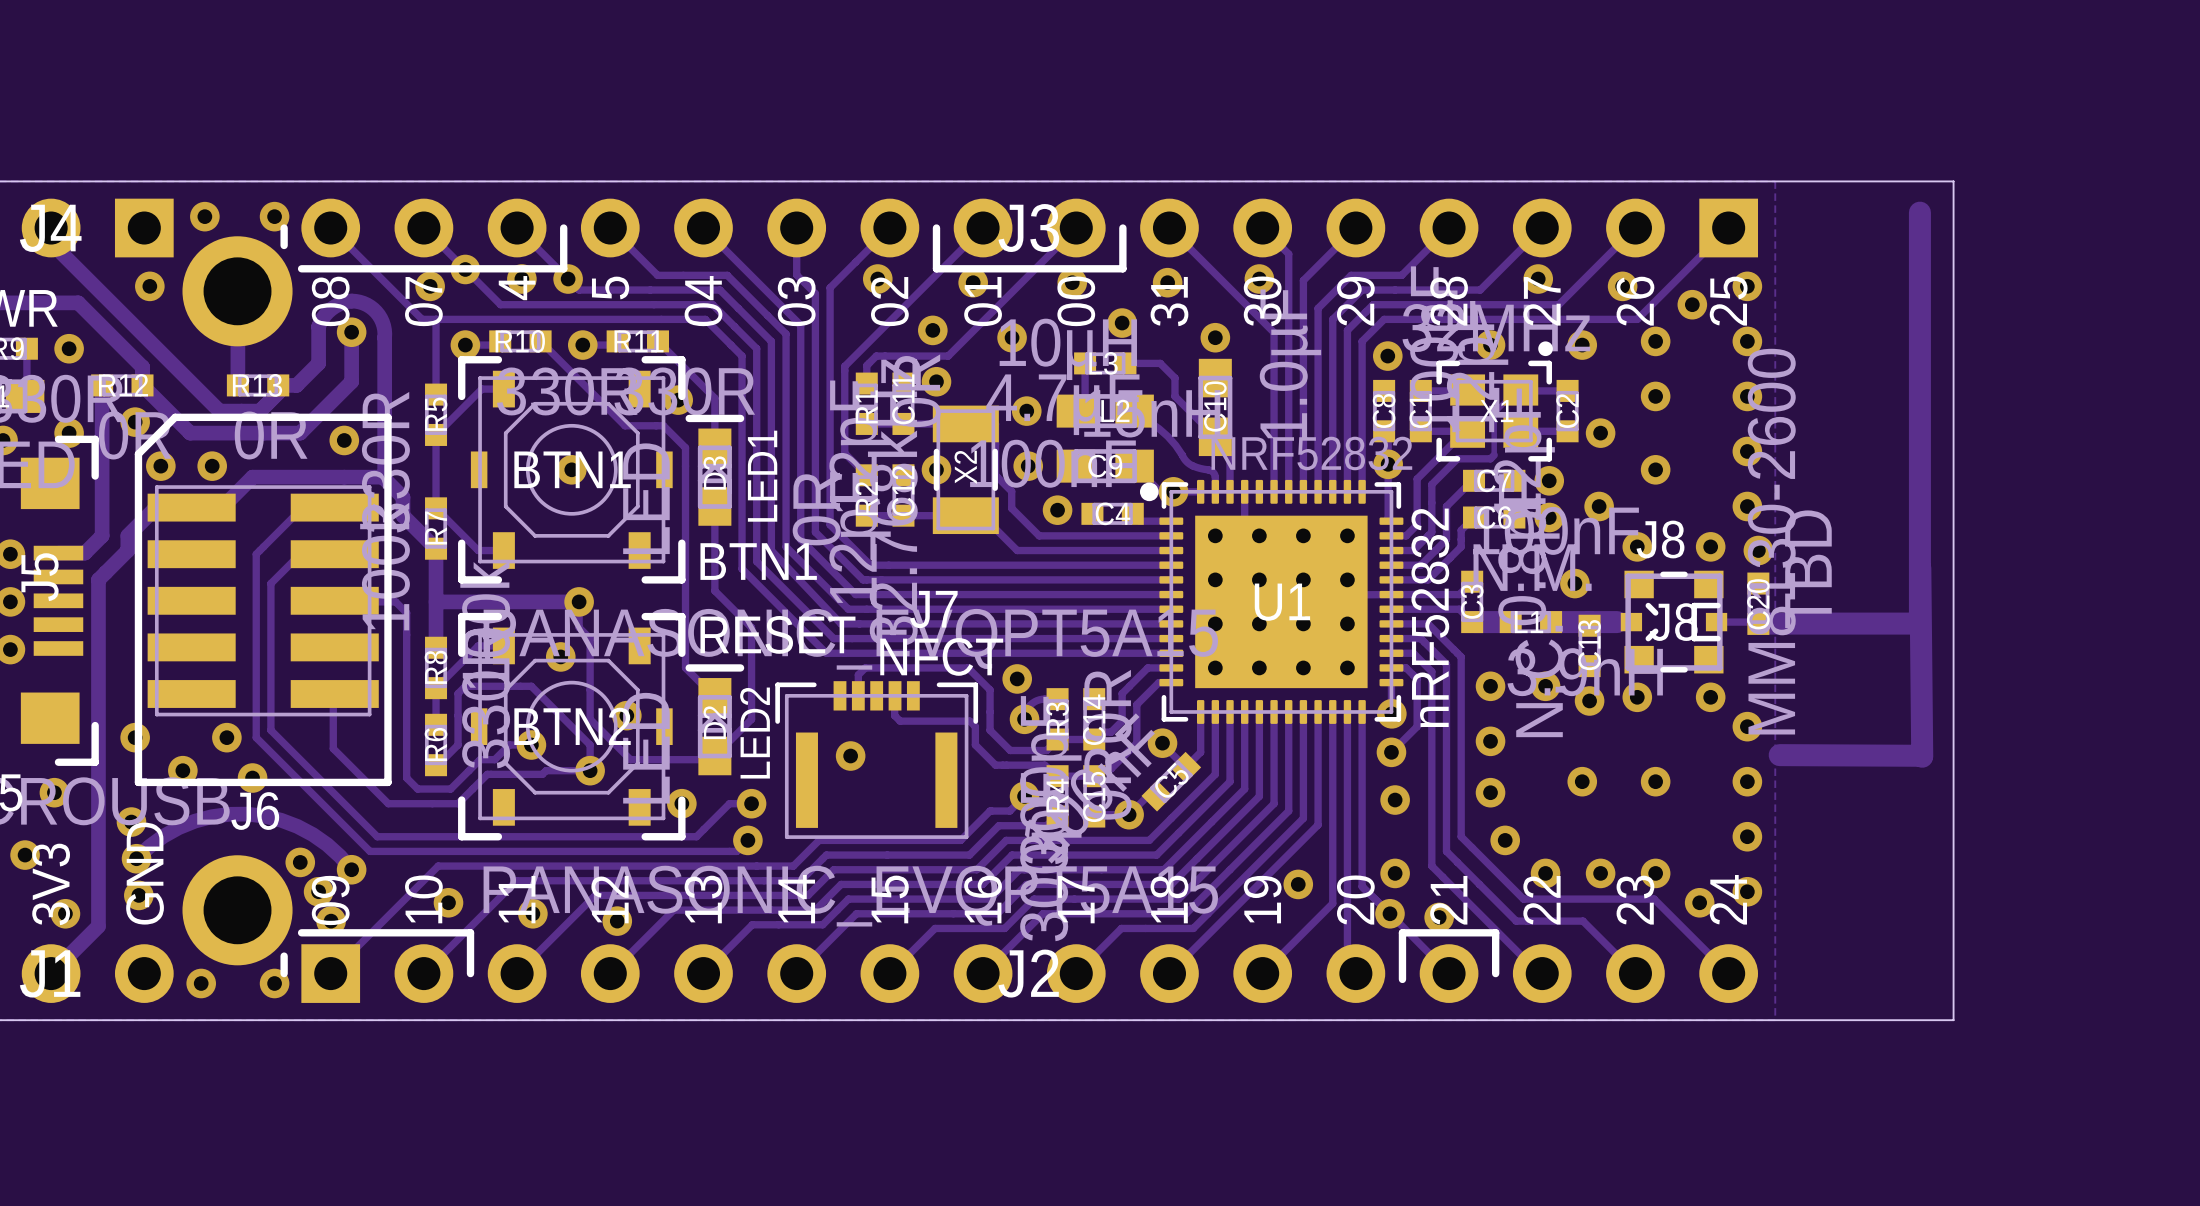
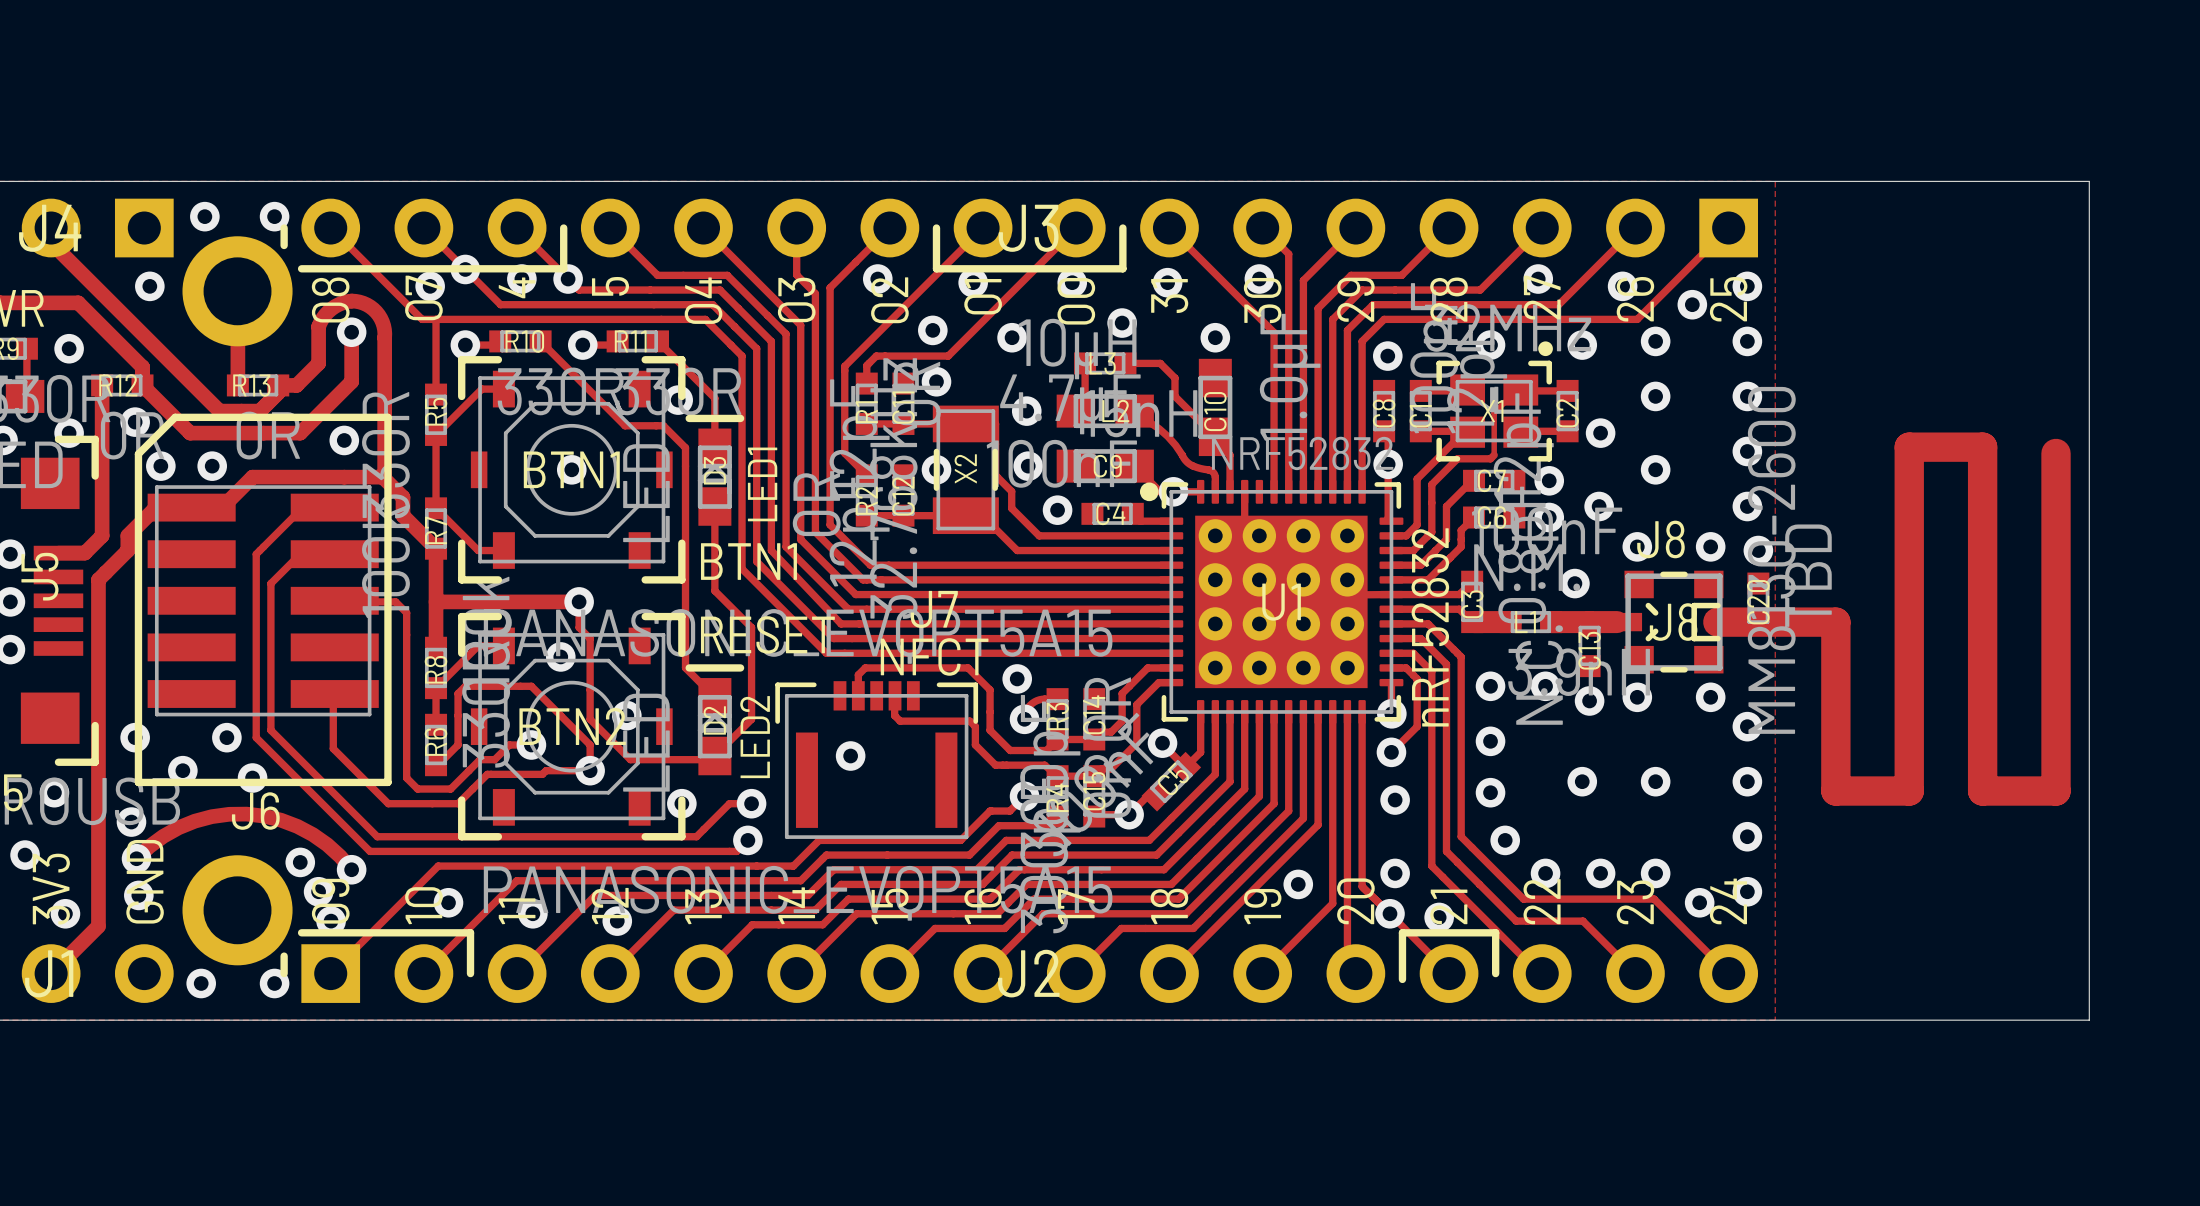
board edge: (1953, 181) (1953, 1020) -> (1953, 181) (2089, 181) (2089, 1020) (1953, 1020)
track: (1919, 212) (1919, 623) (1758, 623) -> none
track: none -> (2056, 453) (2056, 791) (1982, 791) (1982, 447) (1909, 447) (1909, 791) (1835, 791) (1835, 622) (1717, 622)
track: (1920, 568) (1922, 756) -> none
track: (1779, 755) (1921, 755) -> none

